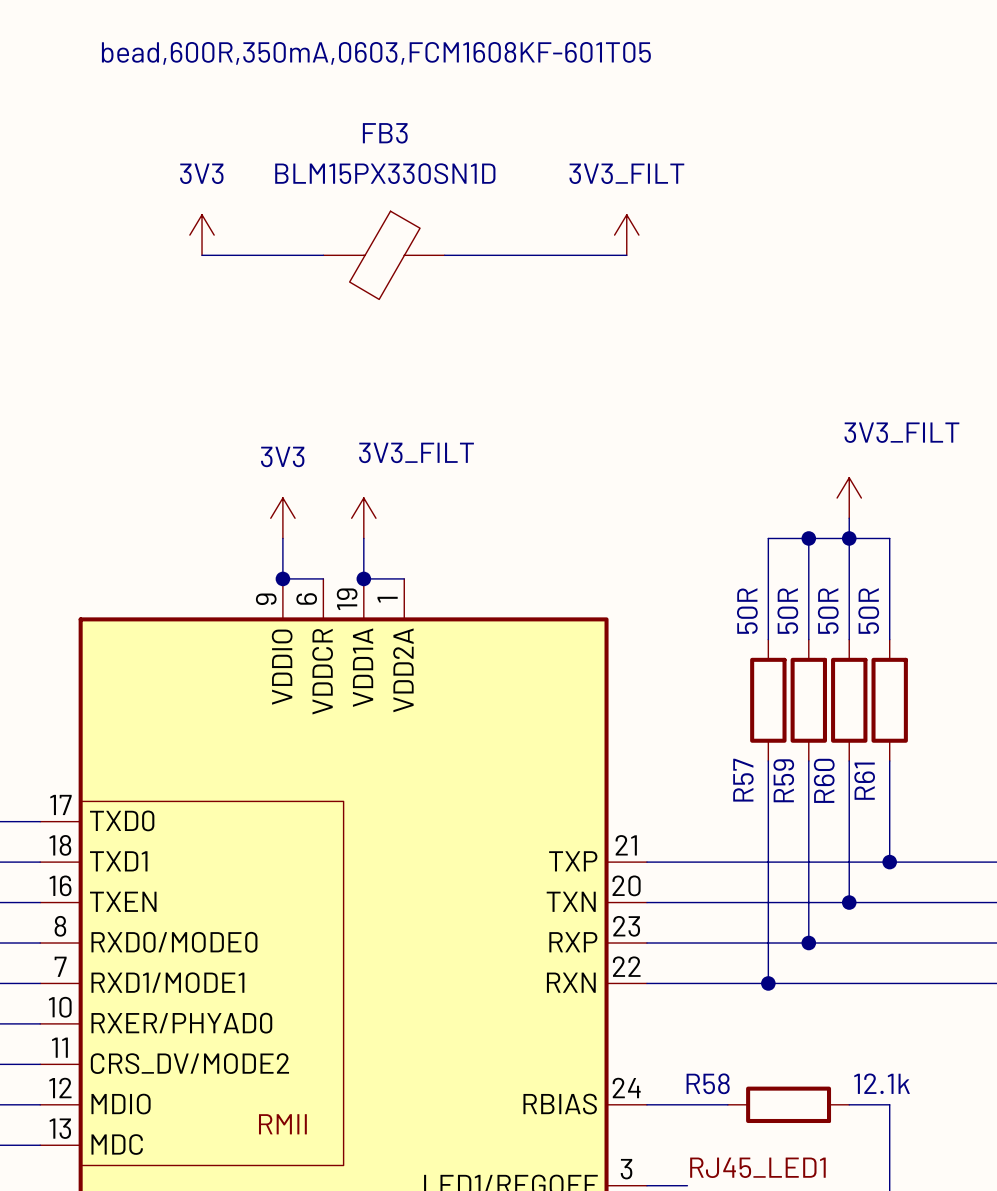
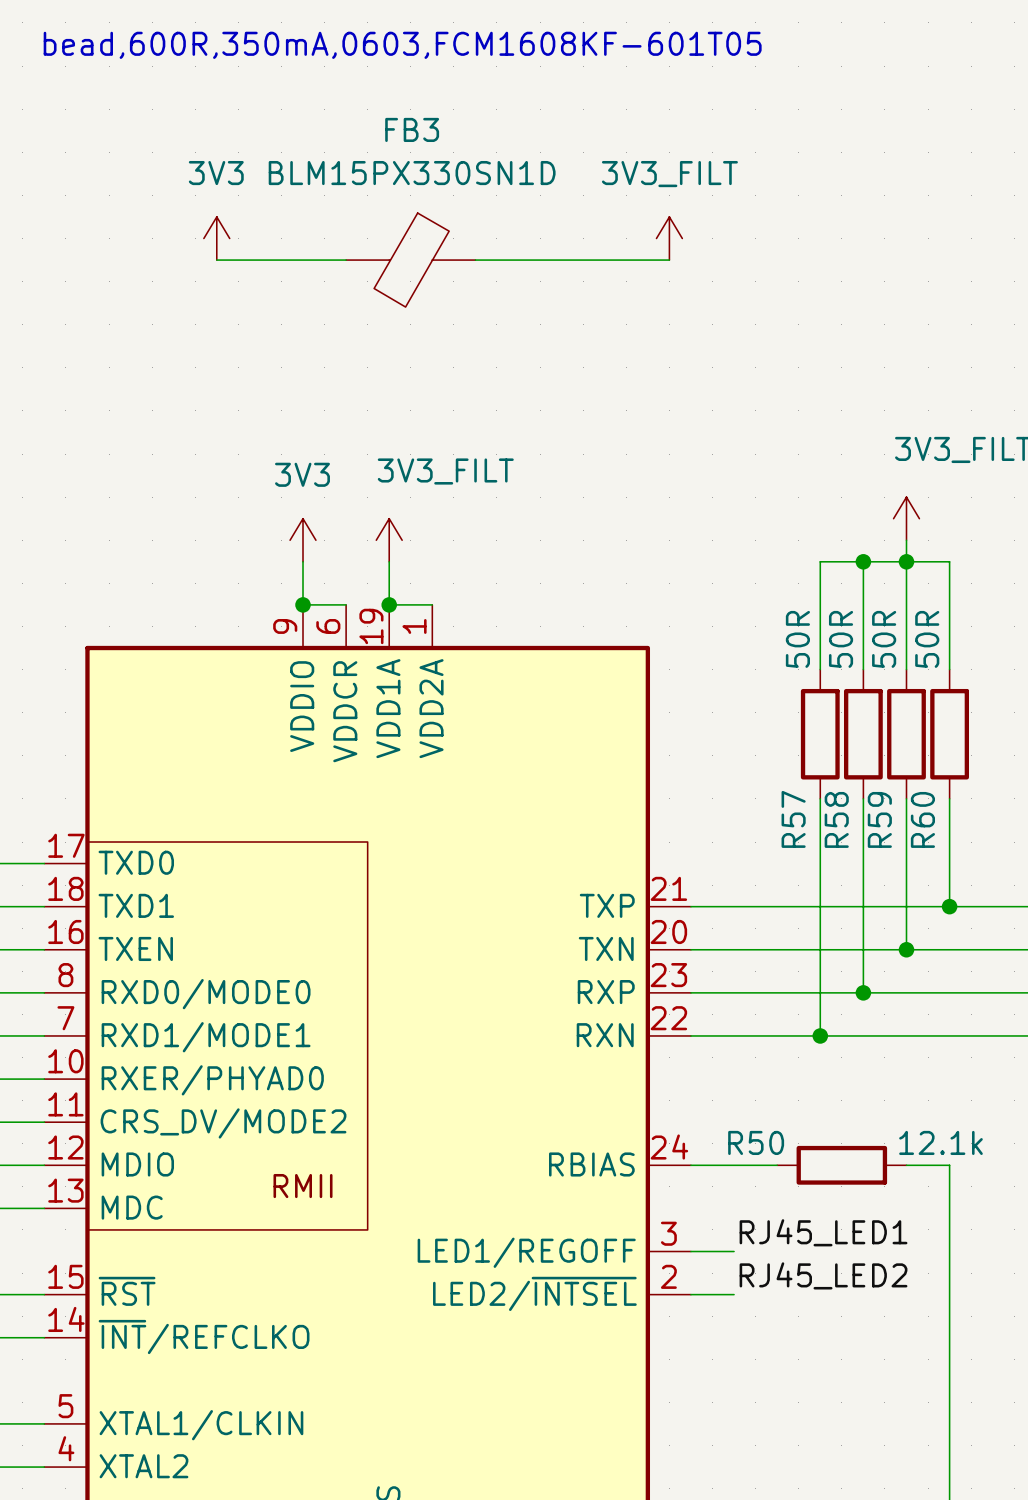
R59 name: R59 (783, 780) -> R58 (836, 819)
R60 name: R60 (824, 780) -> R59 (879, 819)
R61 name: R61 (864, 781) -> R60 (922, 819)
R58 name: R58 (708, 1083) -> R50 (756, 1142)

